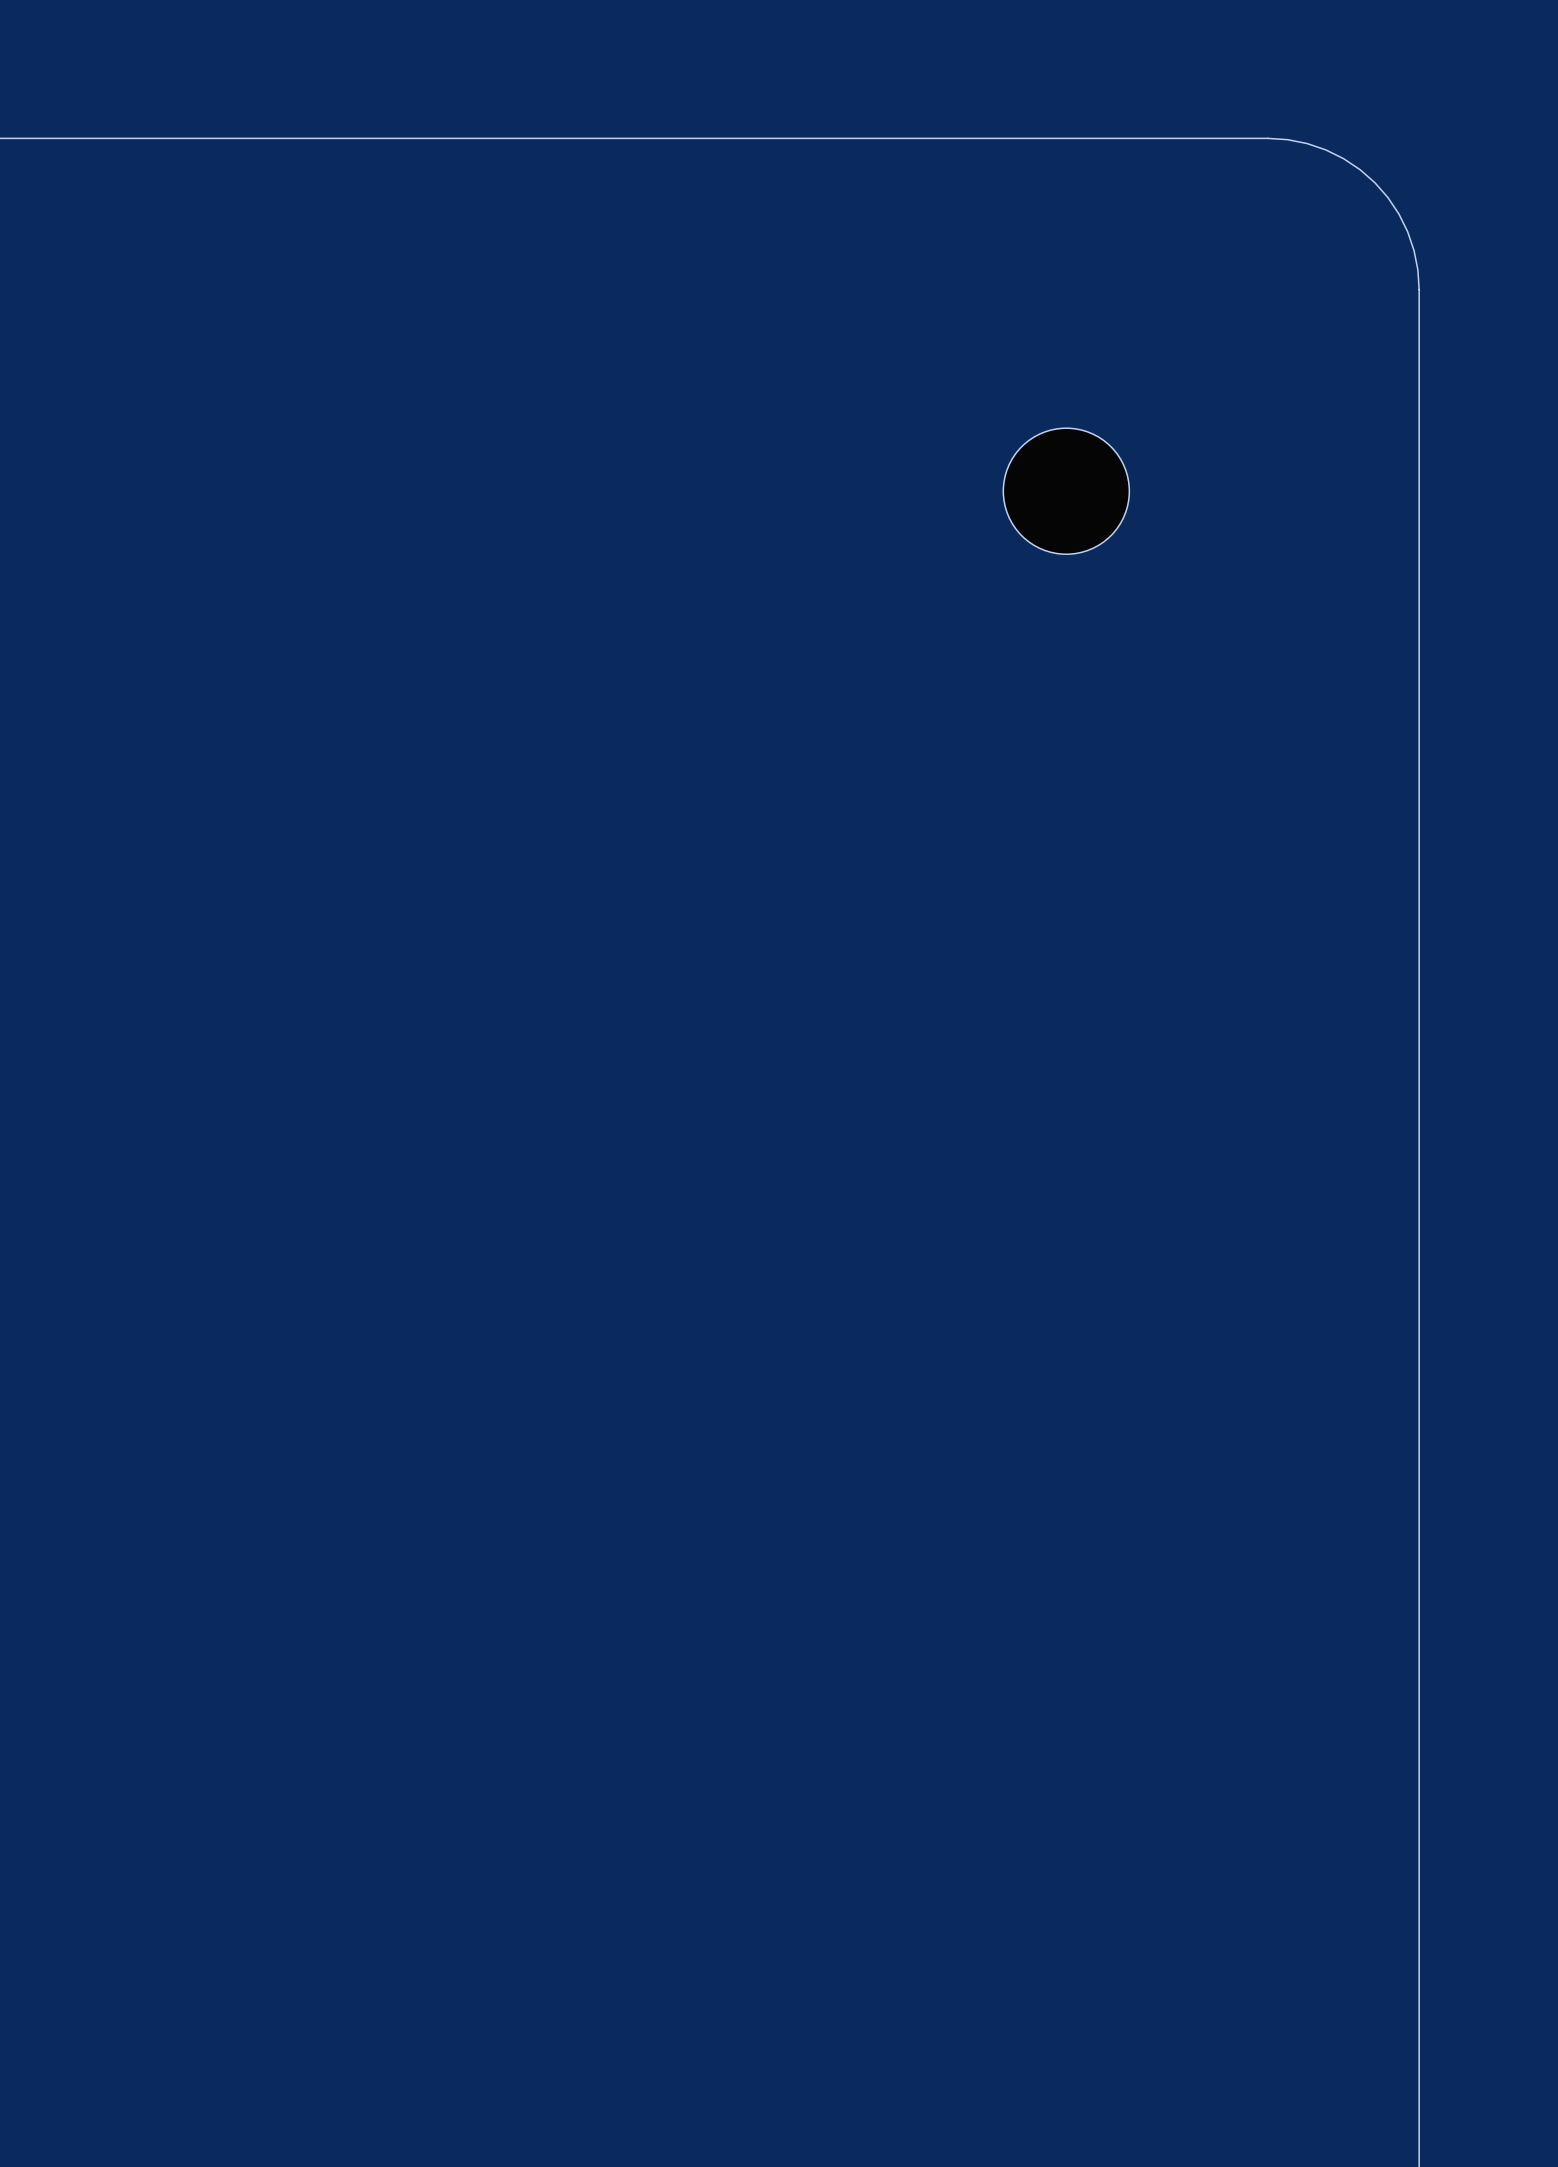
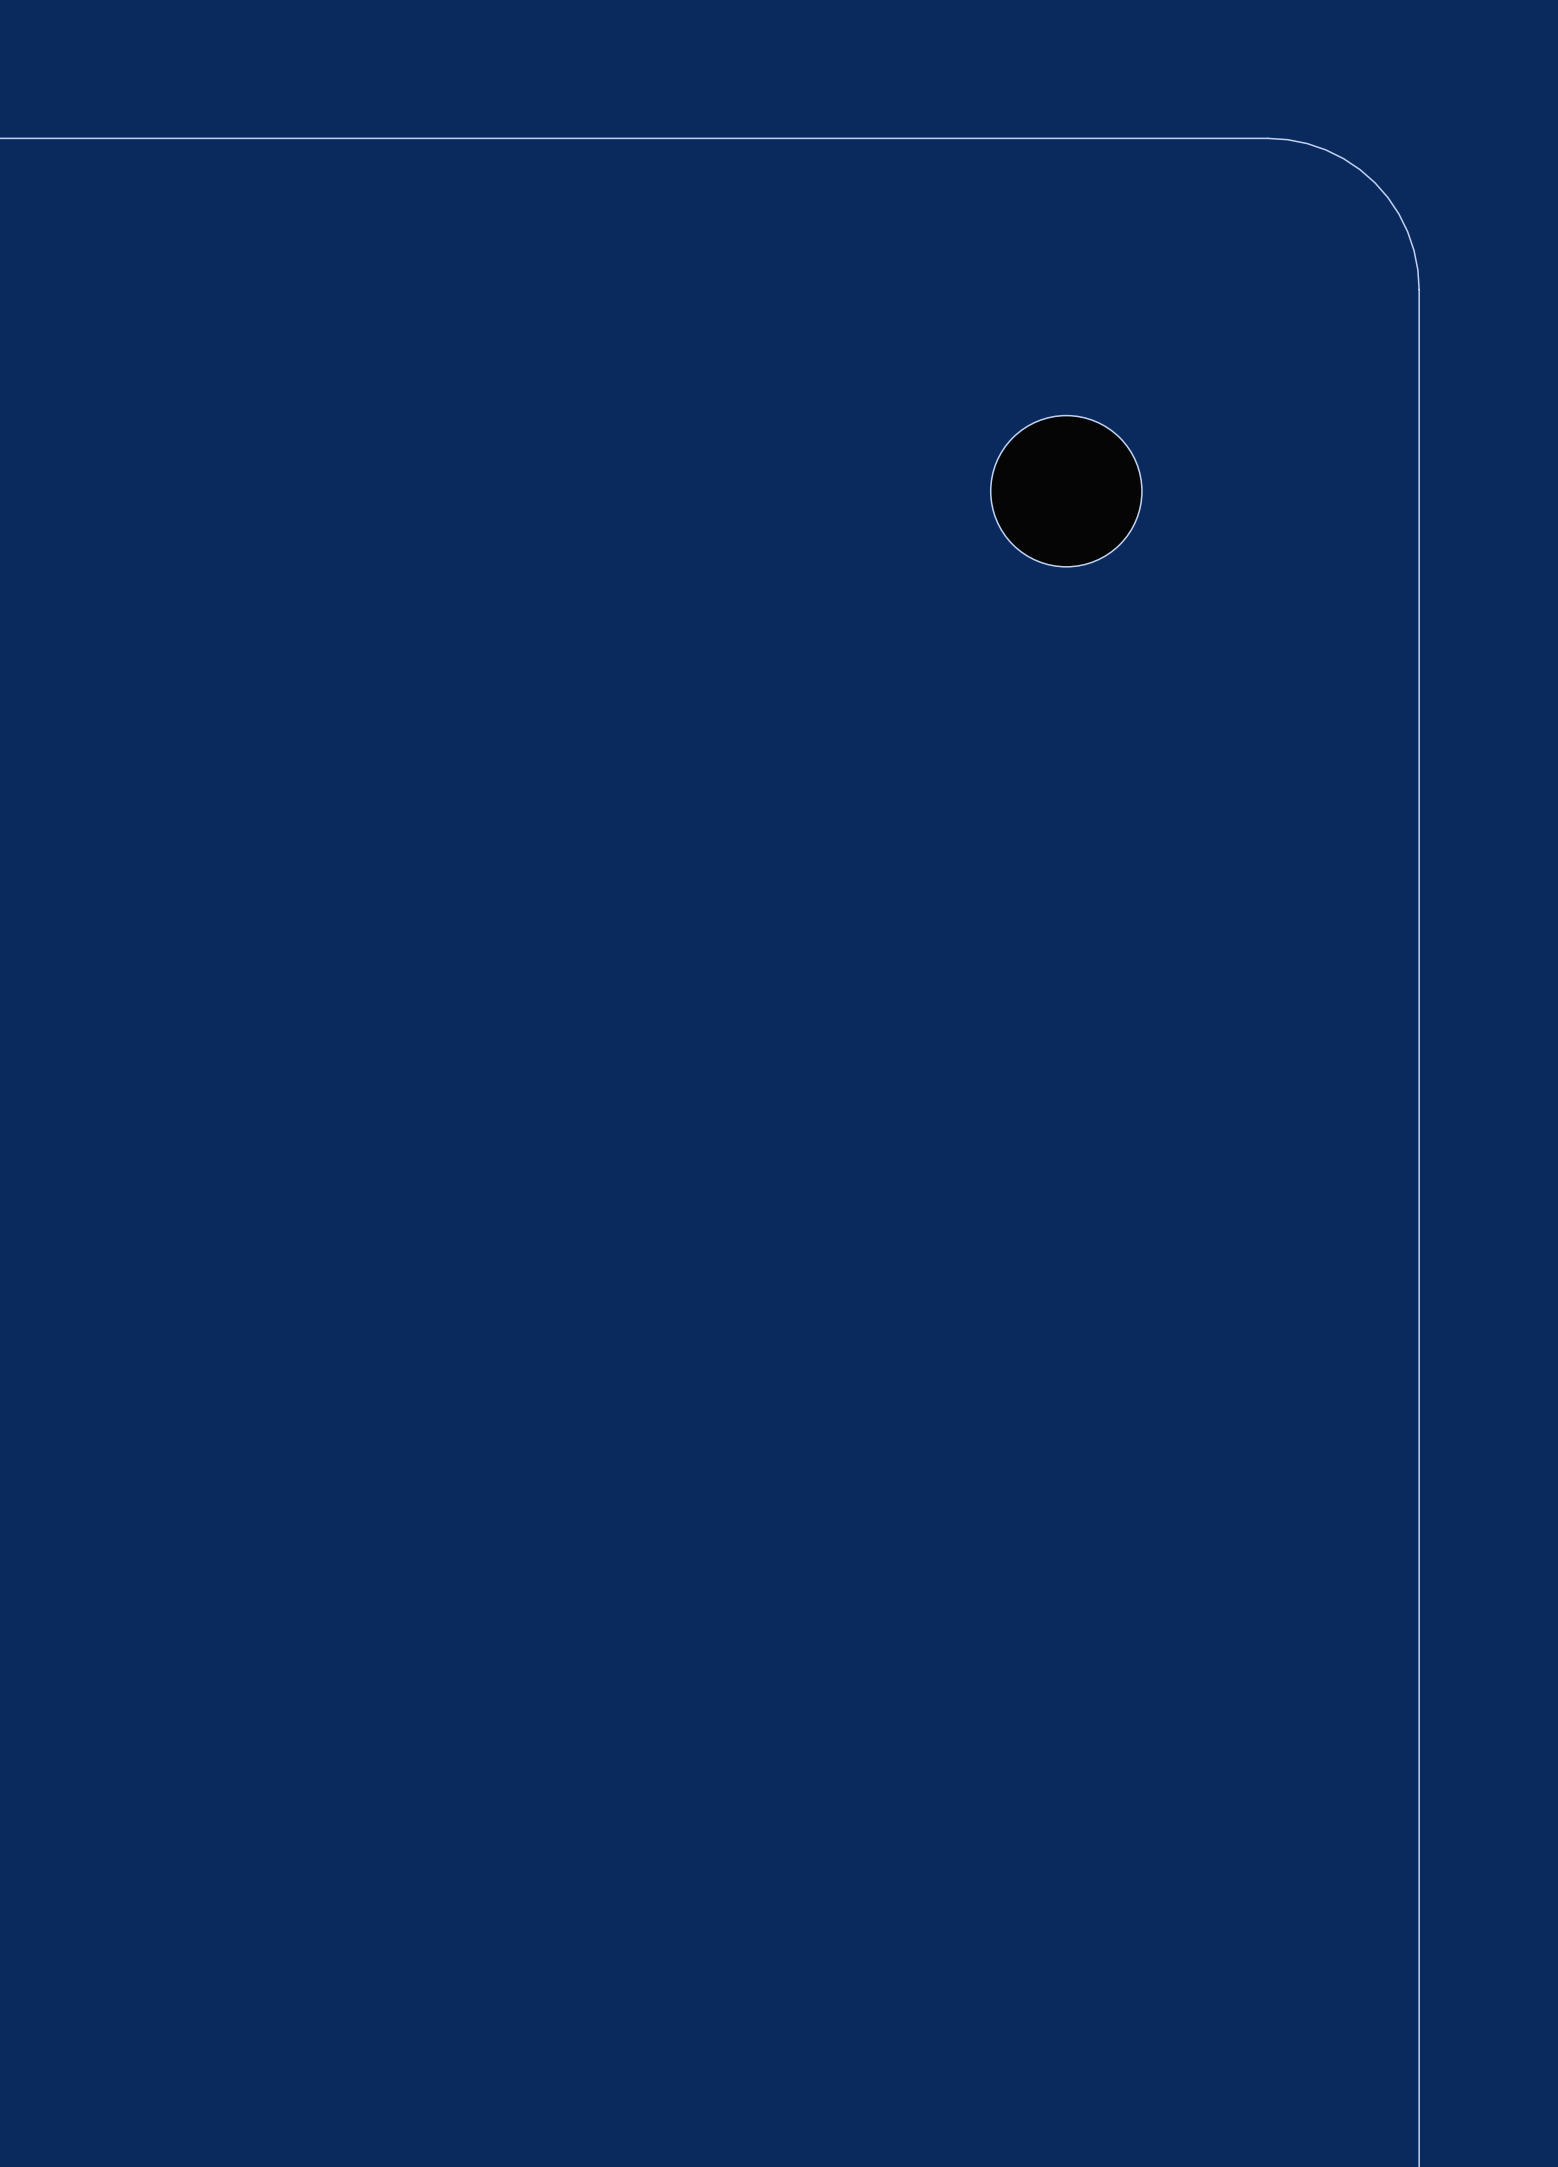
hole size: [1003, 428, 1130, 555] -> [990, 415, 1142, 567]

